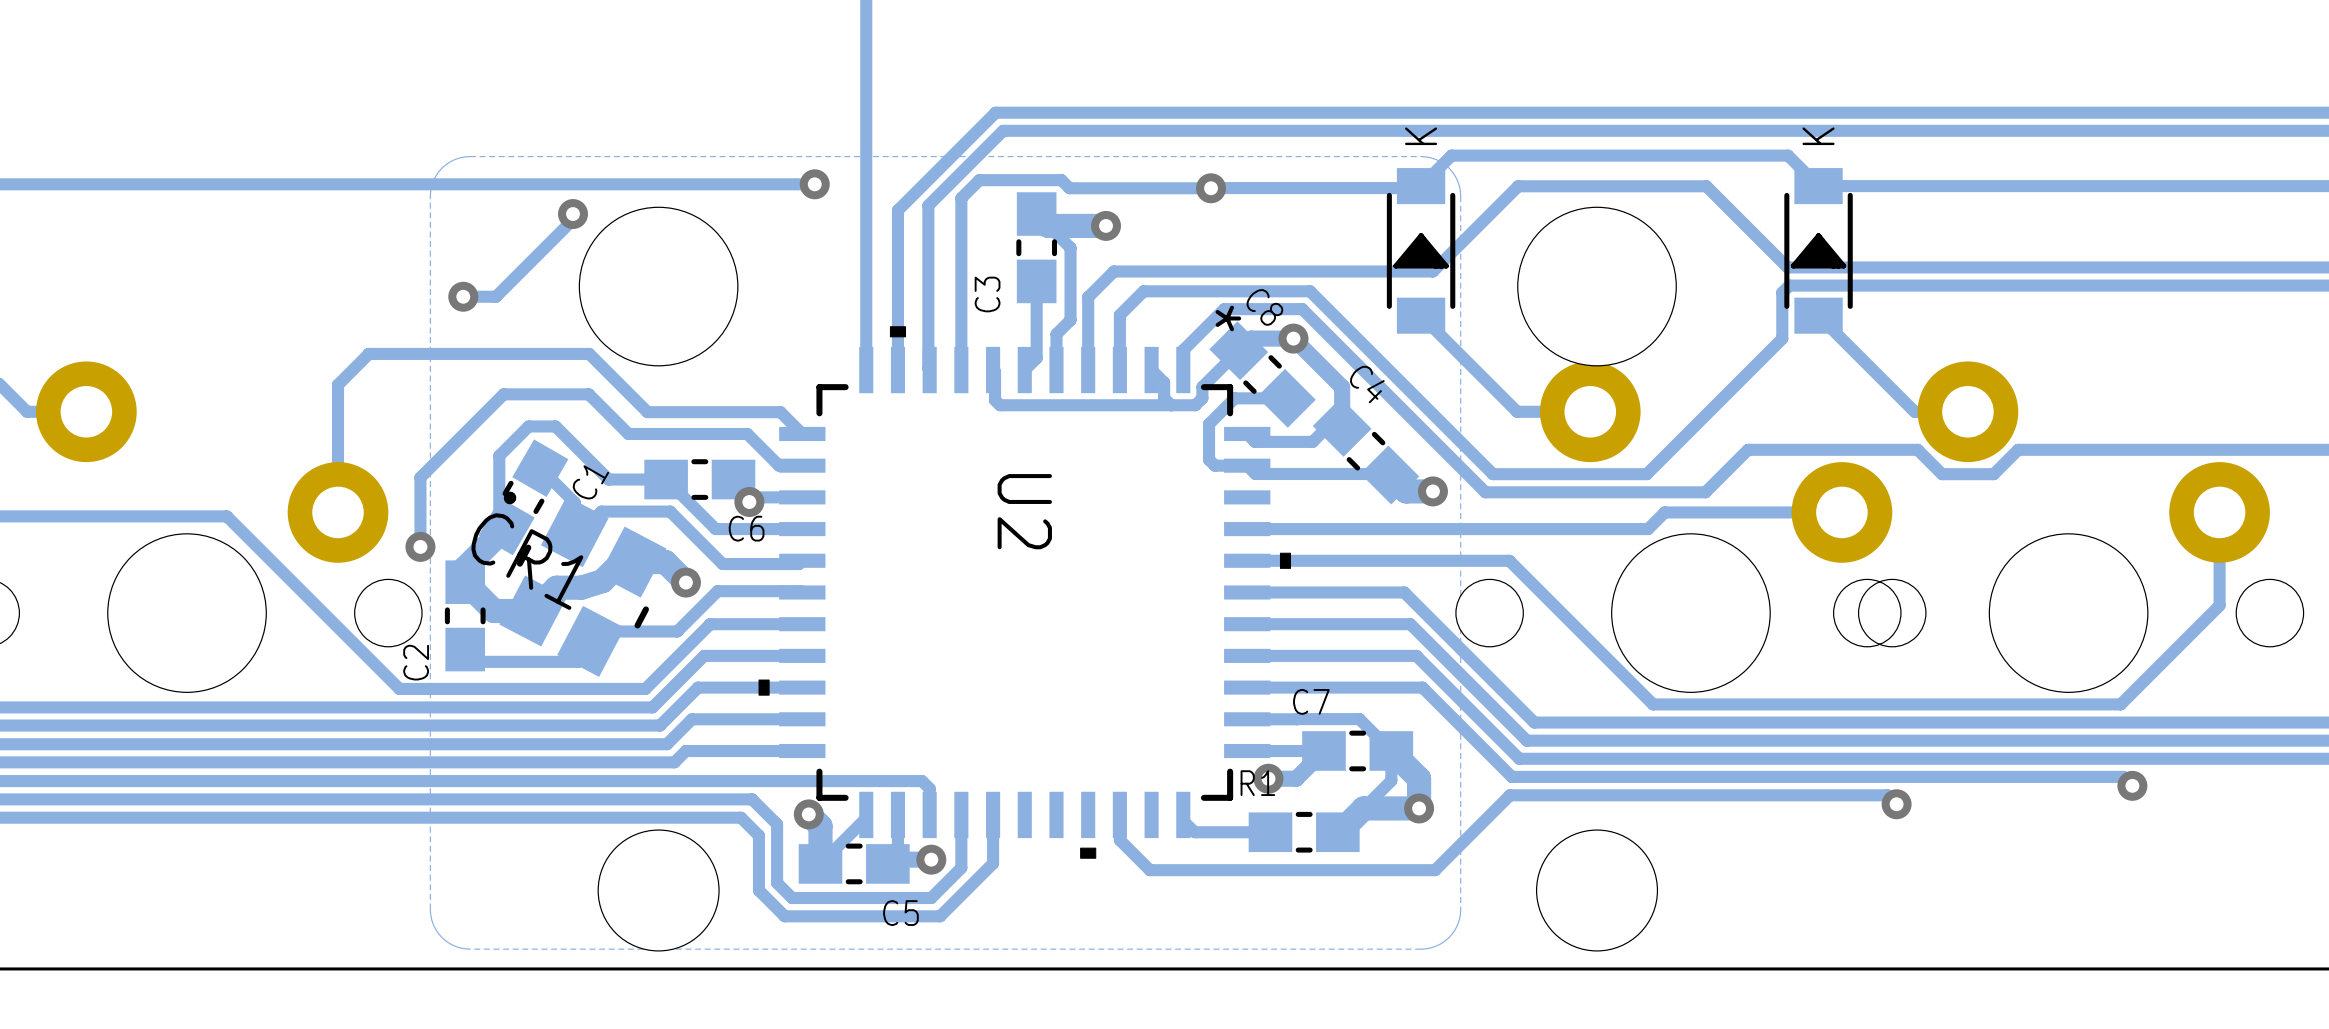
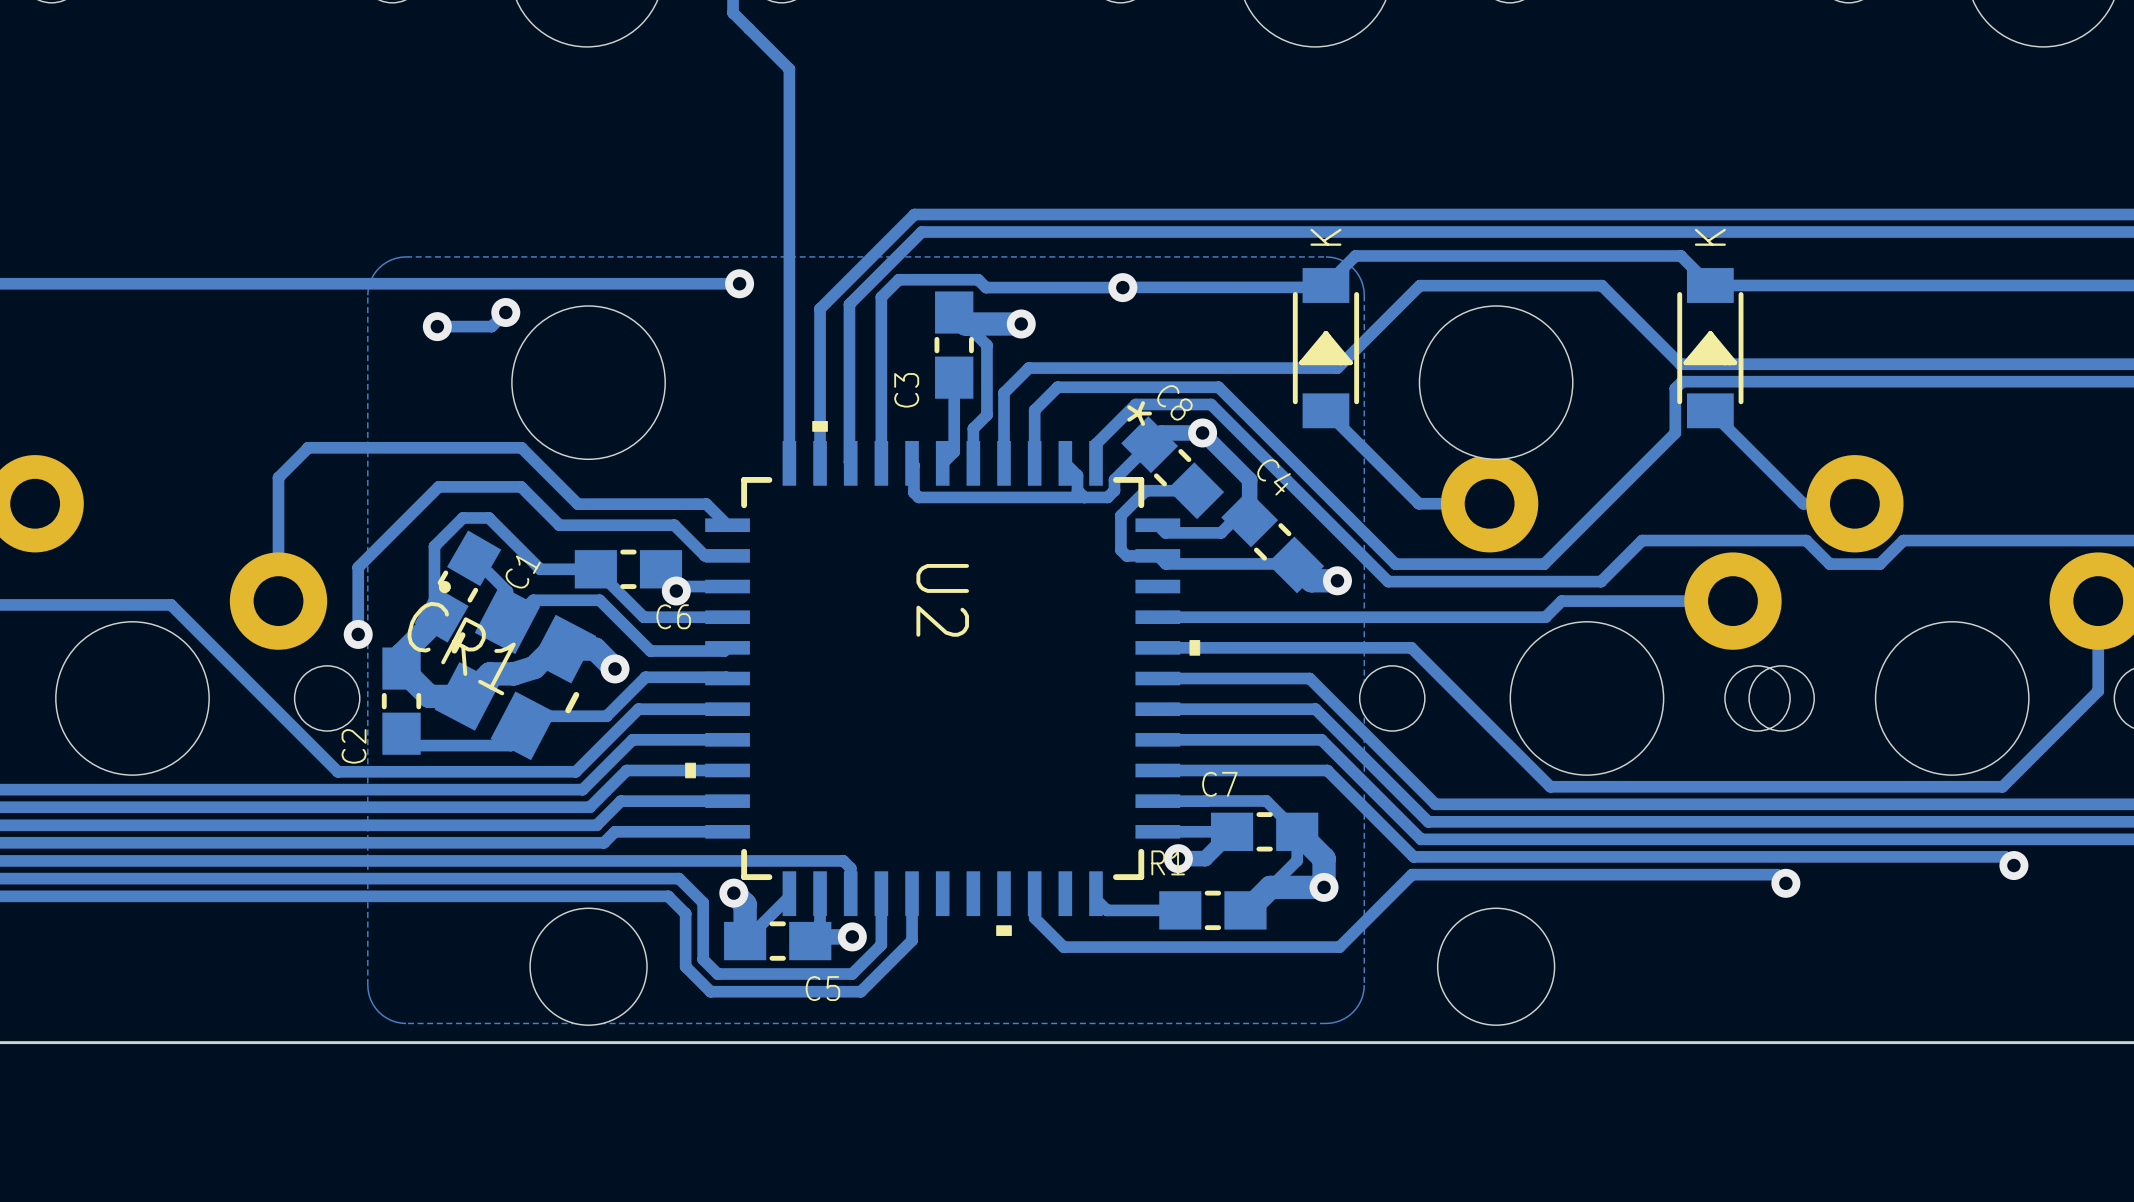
track: (573, 214) (573, 219) (495, 296) (463, 296) -> (505, 312) (491, 326) (437, 326)
via position: (463, 296) -> (437, 326)

